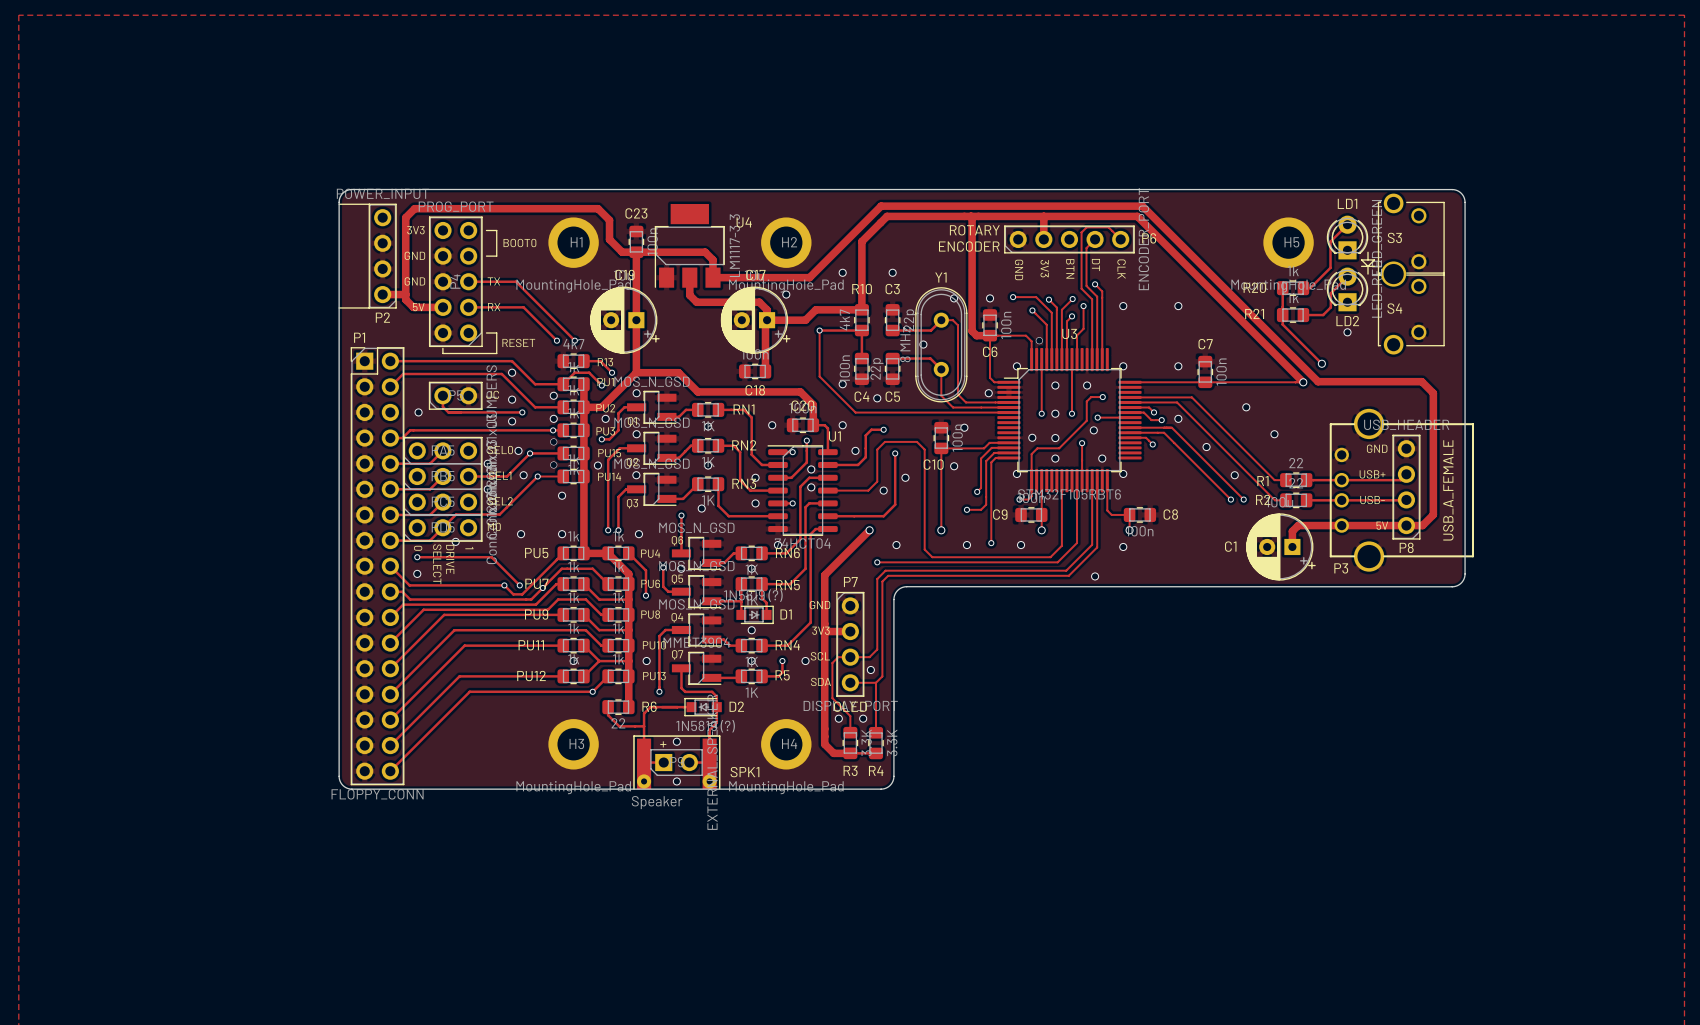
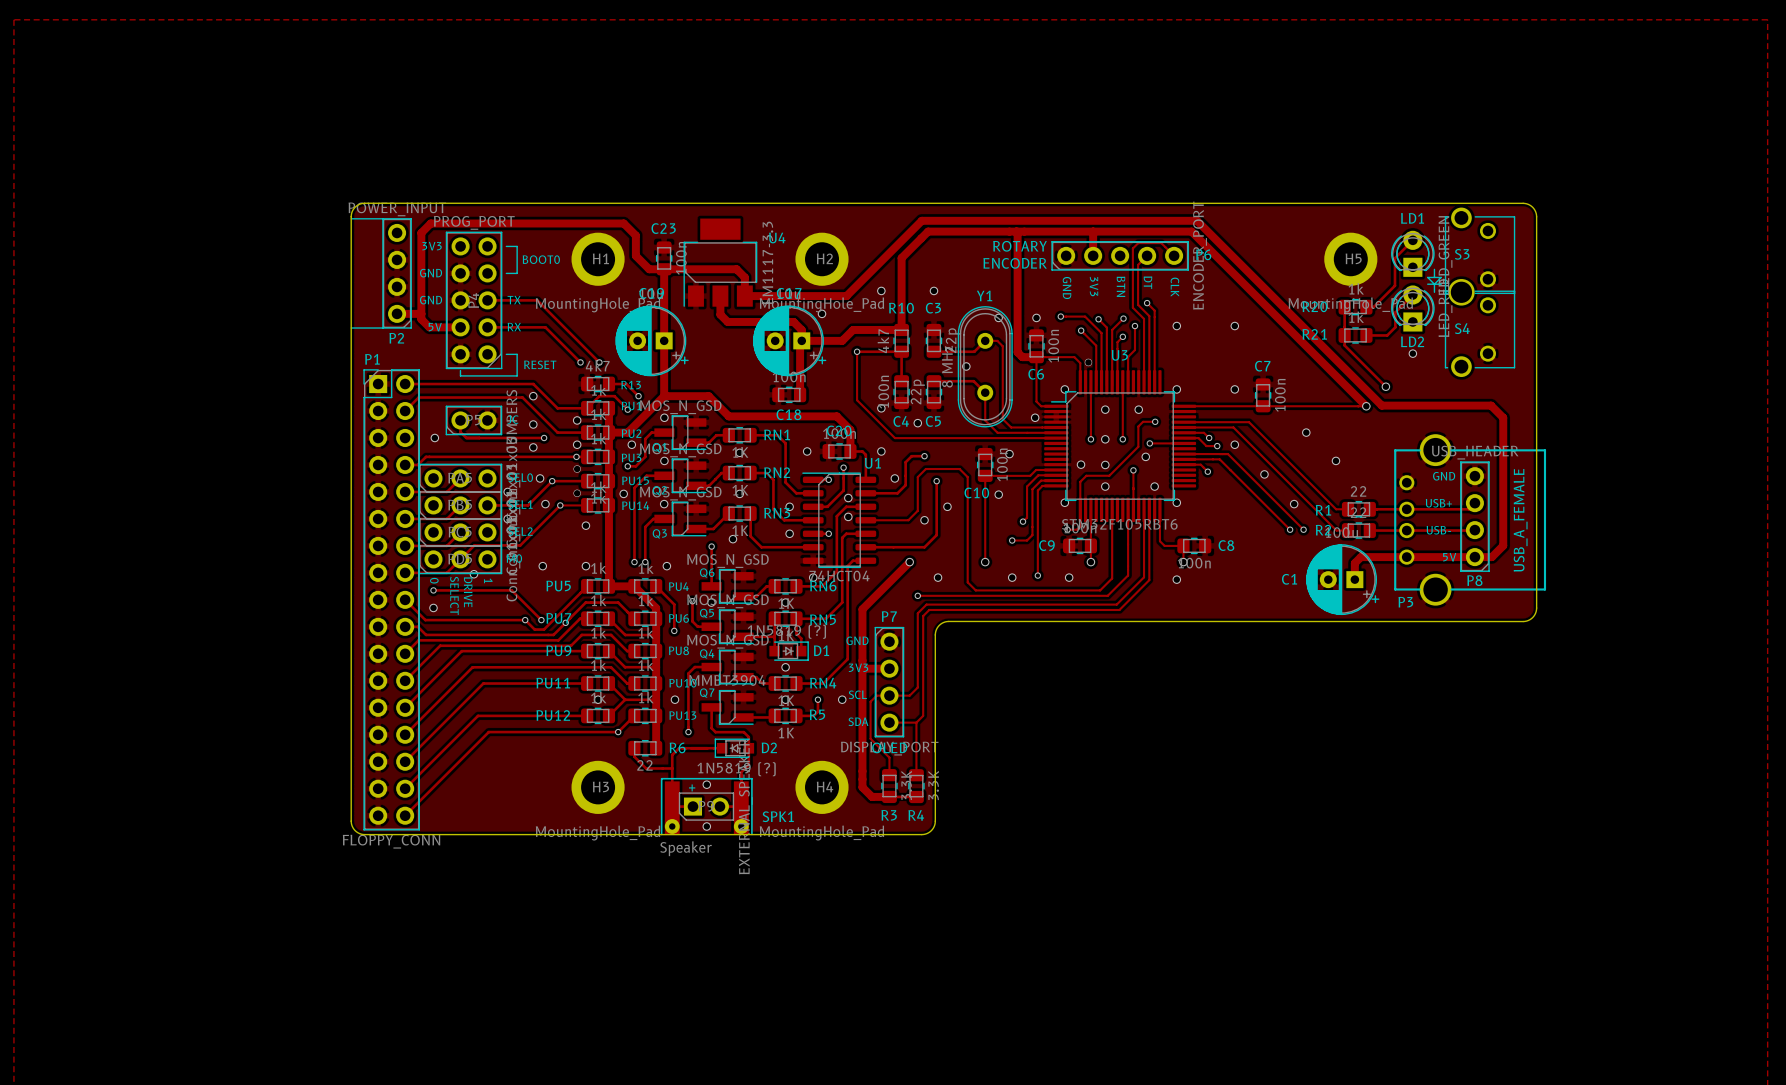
via: (1095, 576) -> none
via: (870, 669) -> none
via: (838, 718) -> none
via: (863, 718) -> none

